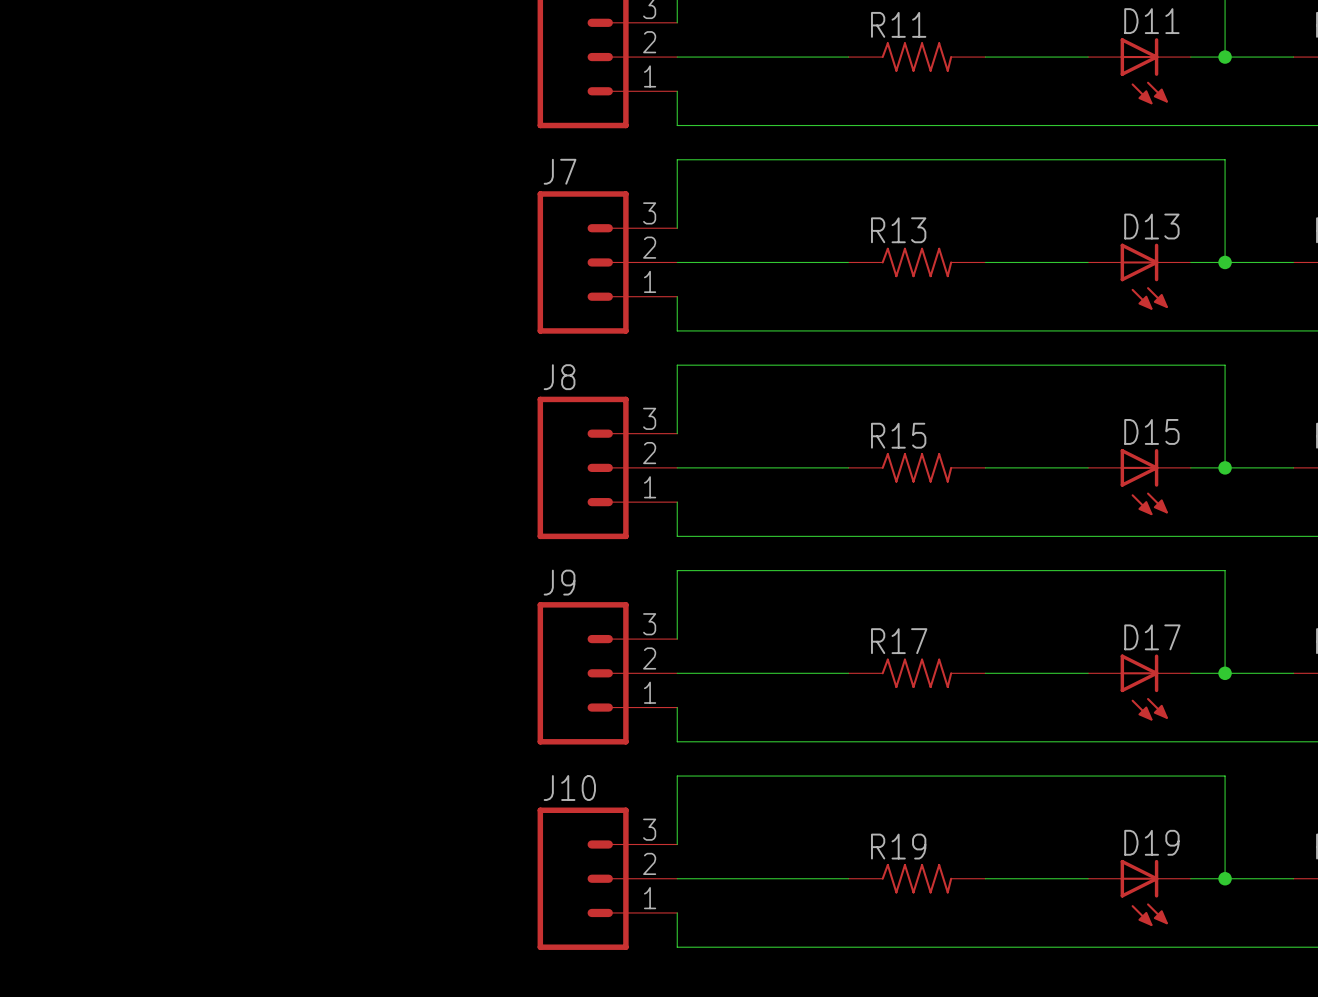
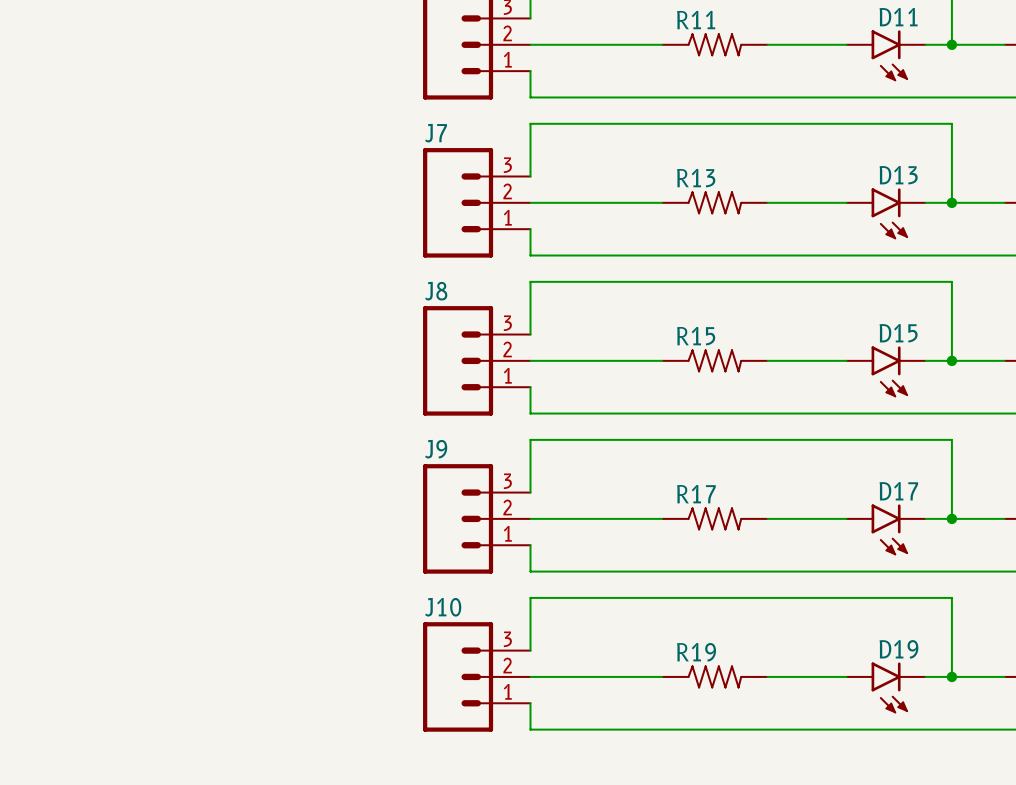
D11 symbol: [1088, 38, 1191, 105] -> [846, 30, 926, 82]
D13 symbol: [1088, 243, 1191, 310] -> [846, 188, 926, 240]
D15 symbol: [1088, 449, 1191, 516] -> [846, 346, 926, 398]
D17 symbol: [1088, 654, 1191, 721] -> [846, 504, 926, 556]
D19 symbol: [1088, 859, 1191, 926] -> [846, 662, 926, 714]

